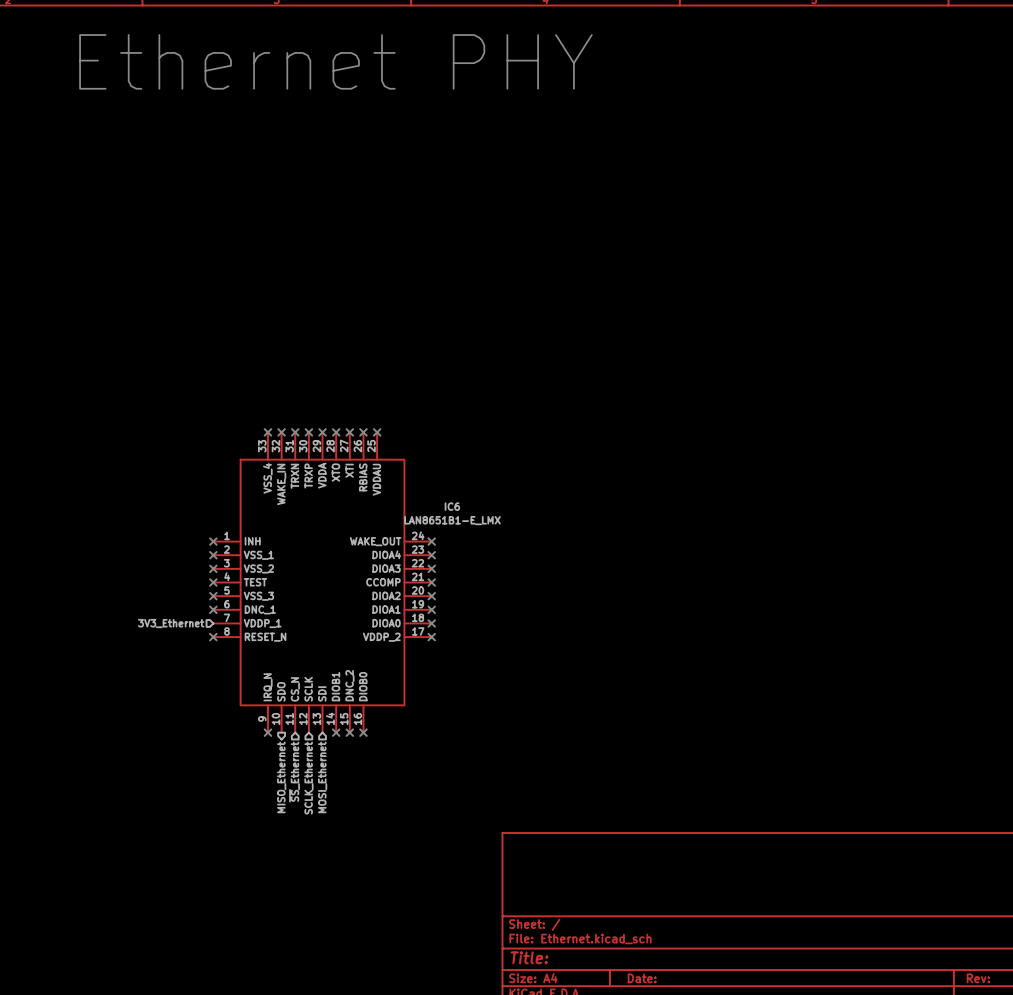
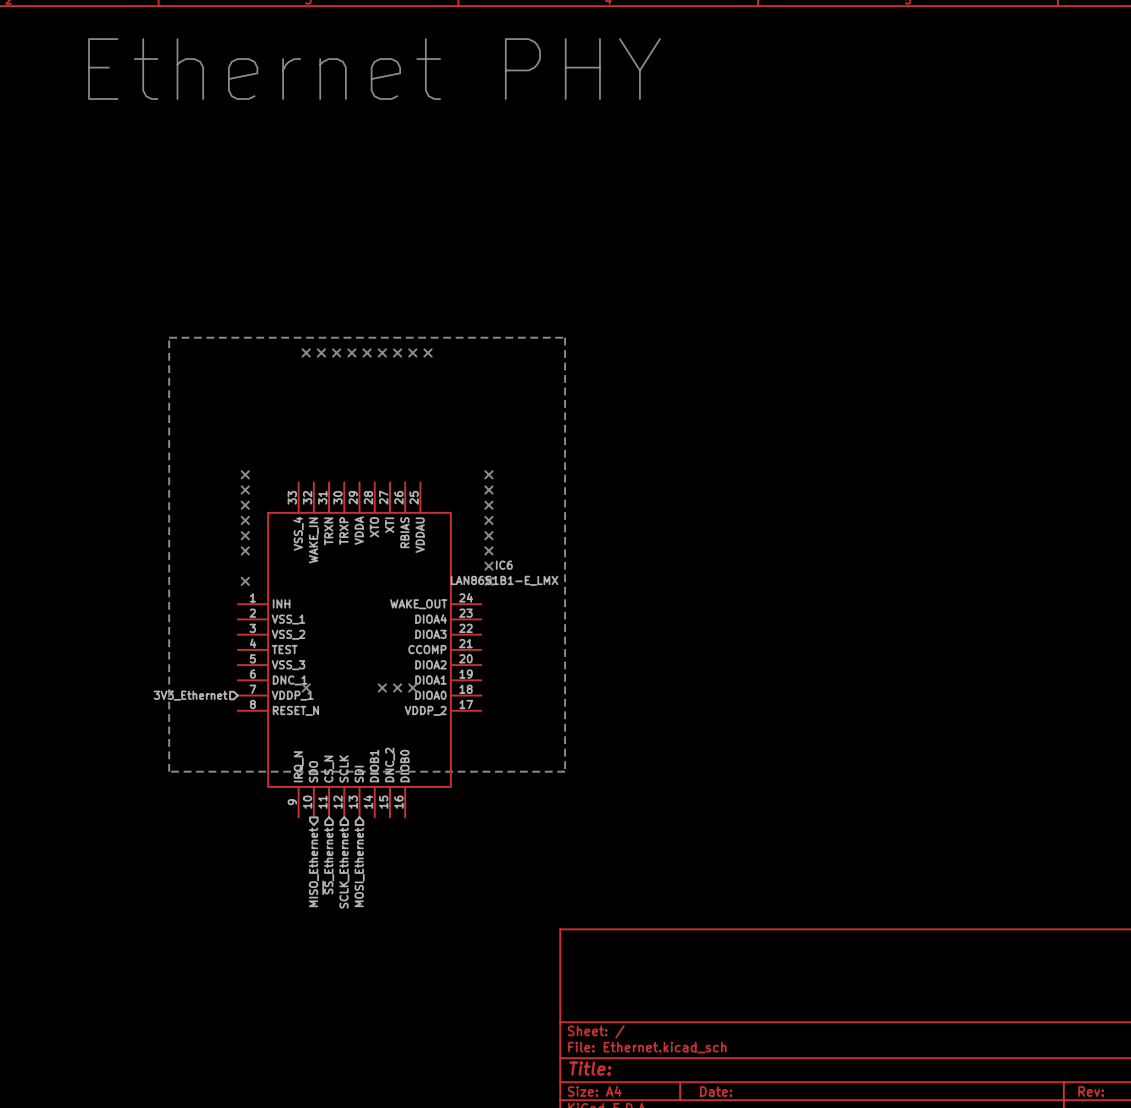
line: none -> (169, 337) (565, 337) (565, 771) (169, 771) (169, 337)
no-connect mark: none -> (306, 352)
no-connect mark: none -> (321, 352)
no-connect mark: none -> (336, 352)
no-connect mark: none -> (351, 352)
no-connect mark: none -> (367, 352)
no-connect mark: none -> (382, 352)
no-connect mark: none -> (397, 352)
no-connect mark: none -> (412, 352)
no-connect mark: none -> (428, 352)
no-connect mark: none -> (245, 474)
no-connect mark: none -> (488, 474)
no-connect mark: (267, 432) -> none
no-connect mark: (281, 432) -> none
no-connect mark: (295, 432) -> none
no-connect mark: (308, 432) -> none
no-connect mark: (322, 432) -> none
no-connect mark: (336, 432) -> none
no-connect mark: (349, 432) -> none
no-connect mark: (363, 432) -> none
no-connect mark: (377, 432) -> none
no-connect mark: none -> (245, 489)
no-connect mark: none -> (488, 489)
no-connect mark: none -> (245, 505)
no-connect mark: none -> (488, 505)
no-connect mark: none -> (245, 520)
no-connect mark: none -> (488, 520)
no-connect mark: none -> (245, 535)
no-connect mark: none -> (488, 535)
no-connect mark: none -> (245, 550)
no-connect mark: none -> (488, 550)
no-connect mark: none -> (488, 566)
no-connect mark: none -> (245, 581)
no-connect mark: none -> (488, 581)
no-connect mark: (213, 541) -> none
no-connect mark: (431, 541) -> none
no-connect mark: (213, 555) -> none
no-connect mark: (431, 555) -> none
no-connect mark: (213, 568) -> none
no-connect mark: (431, 568) -> none
no-connect mark: (213, 582) -> none
no-connect mark: (431, 582) -> none
no-connect mark: (213, 596) -> none
no-connect mark: (431, 596) -> none
no-connect mark: (213, 609) -> none
no-connect mark: (431, 609) -> none
no-connect mark: none -> (306, 687)
no-connect mark: none -> (382, 687)
no-connect mark: none -> (397, 687)
no-connect mark: none -> (412, 687)
no-connect mark: (431, 623) -> none
no-connect mark: (213, 637) -> none
no-connect mark: (431, 637) -> none
no-connect mark: (267, 732) -> none
no-connect mark: (336, 732) -> none
no-connect mark: (349, 732) -> none
no-connect mark: (363, 732) -> none

